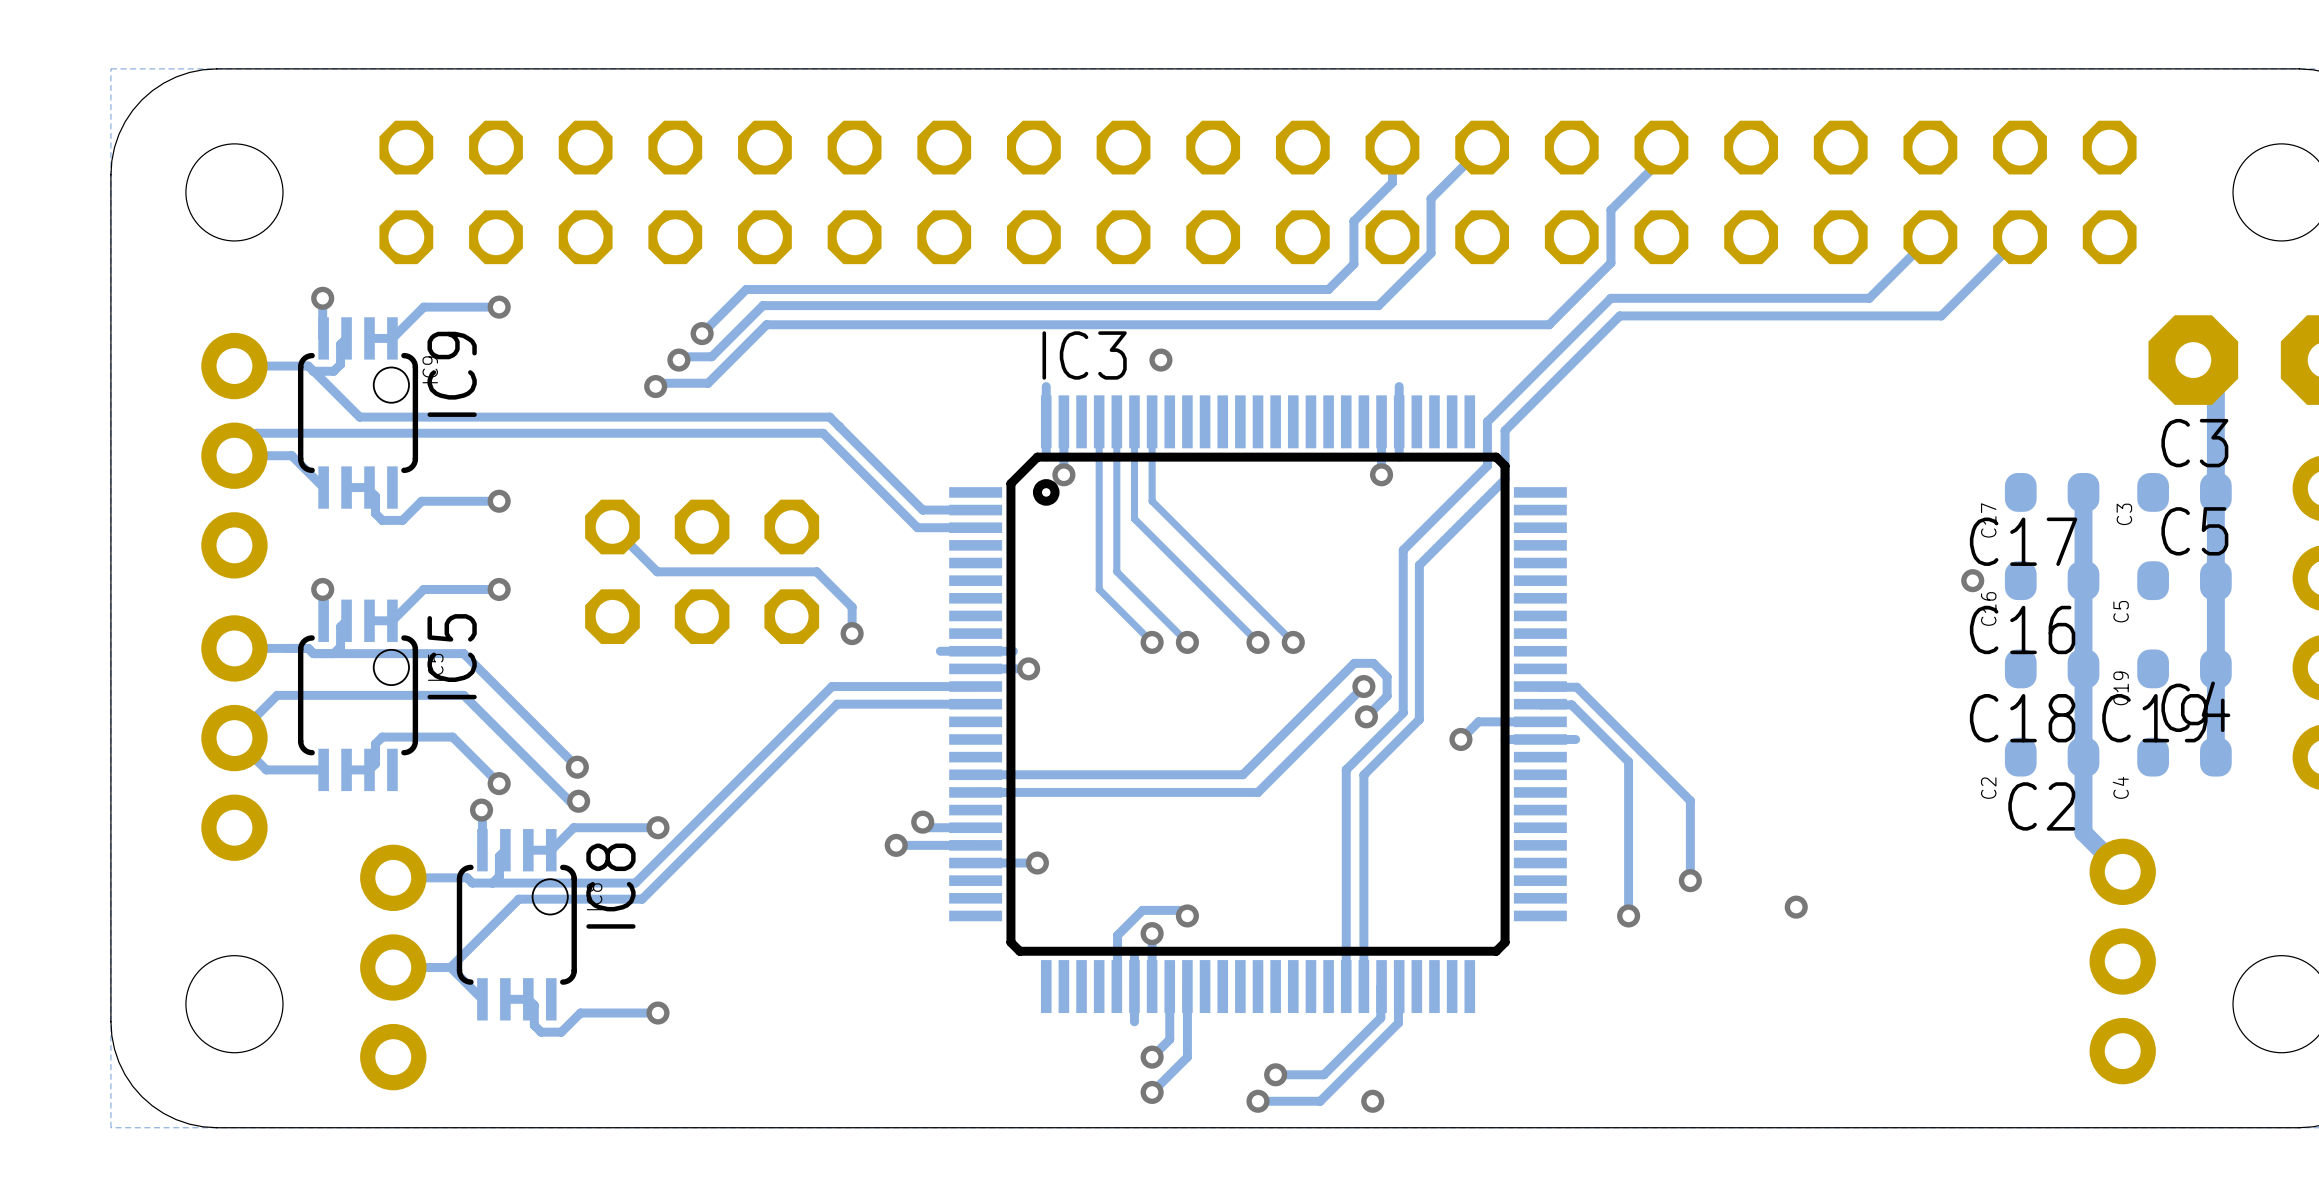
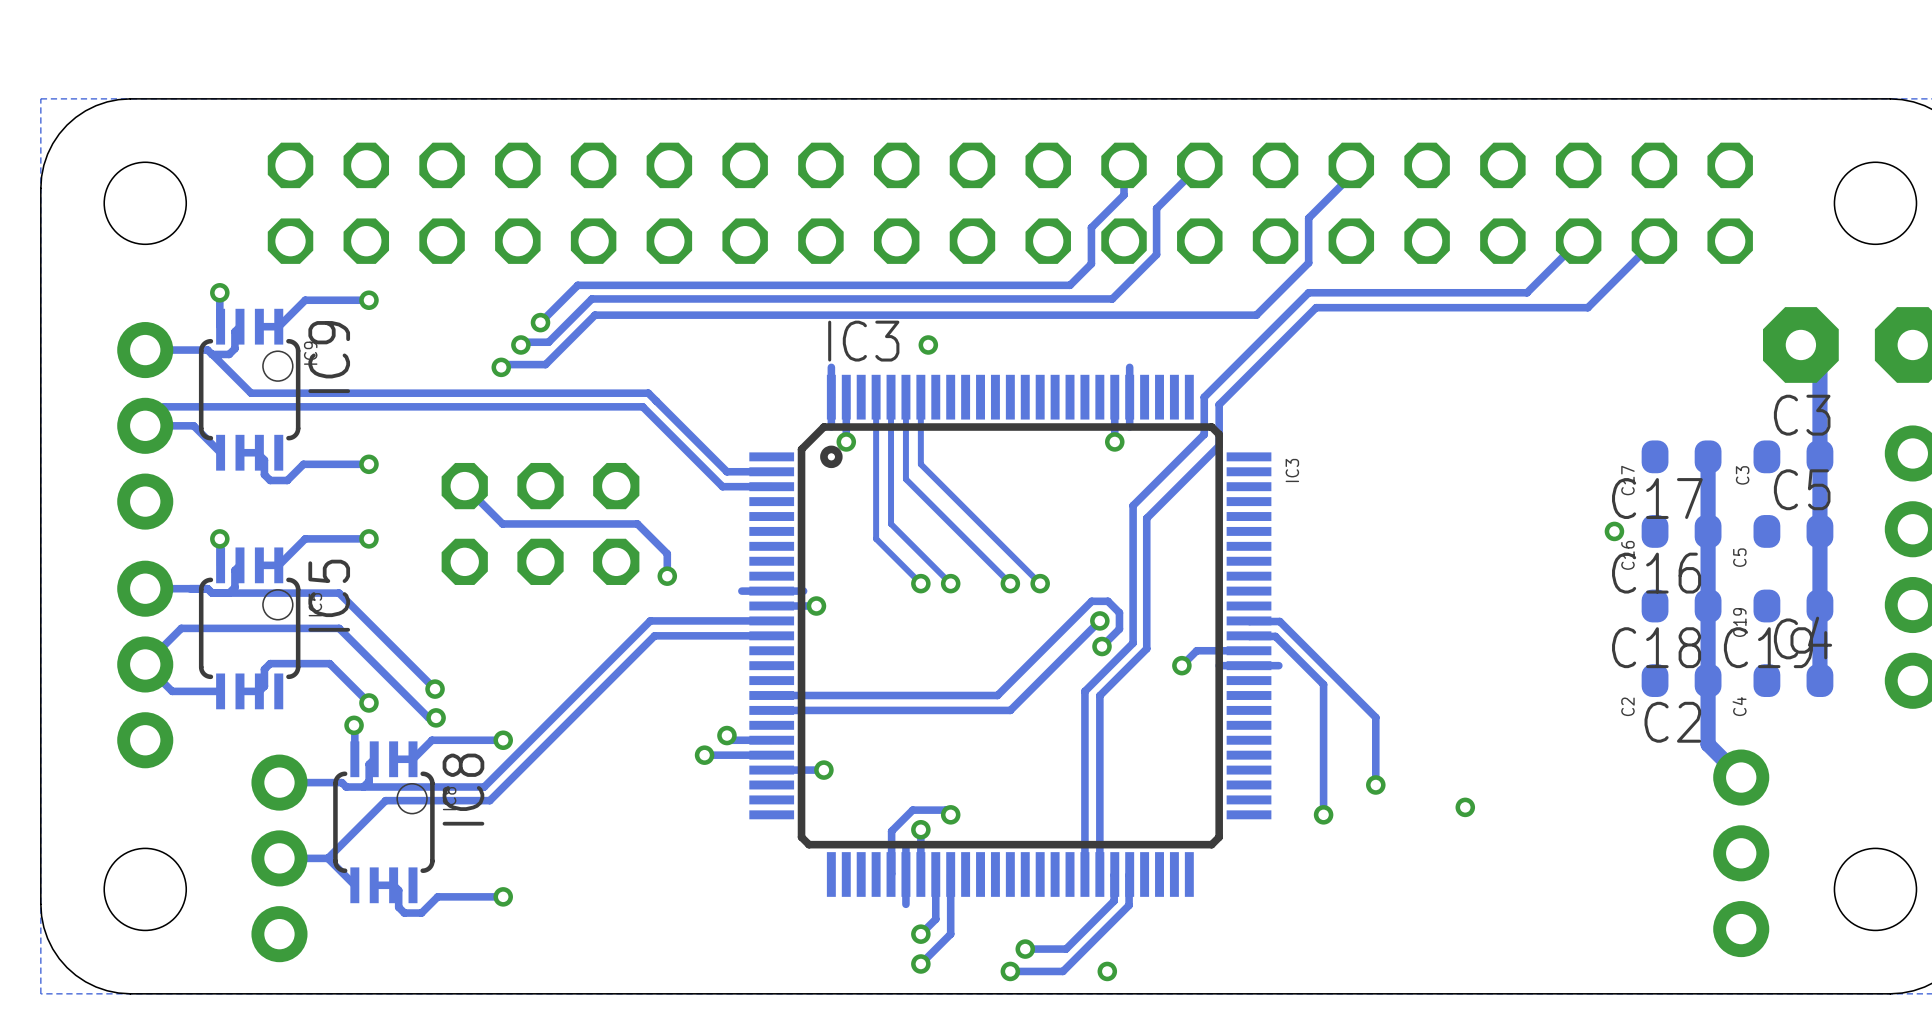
text: none -> IC3 (1292, 470)

